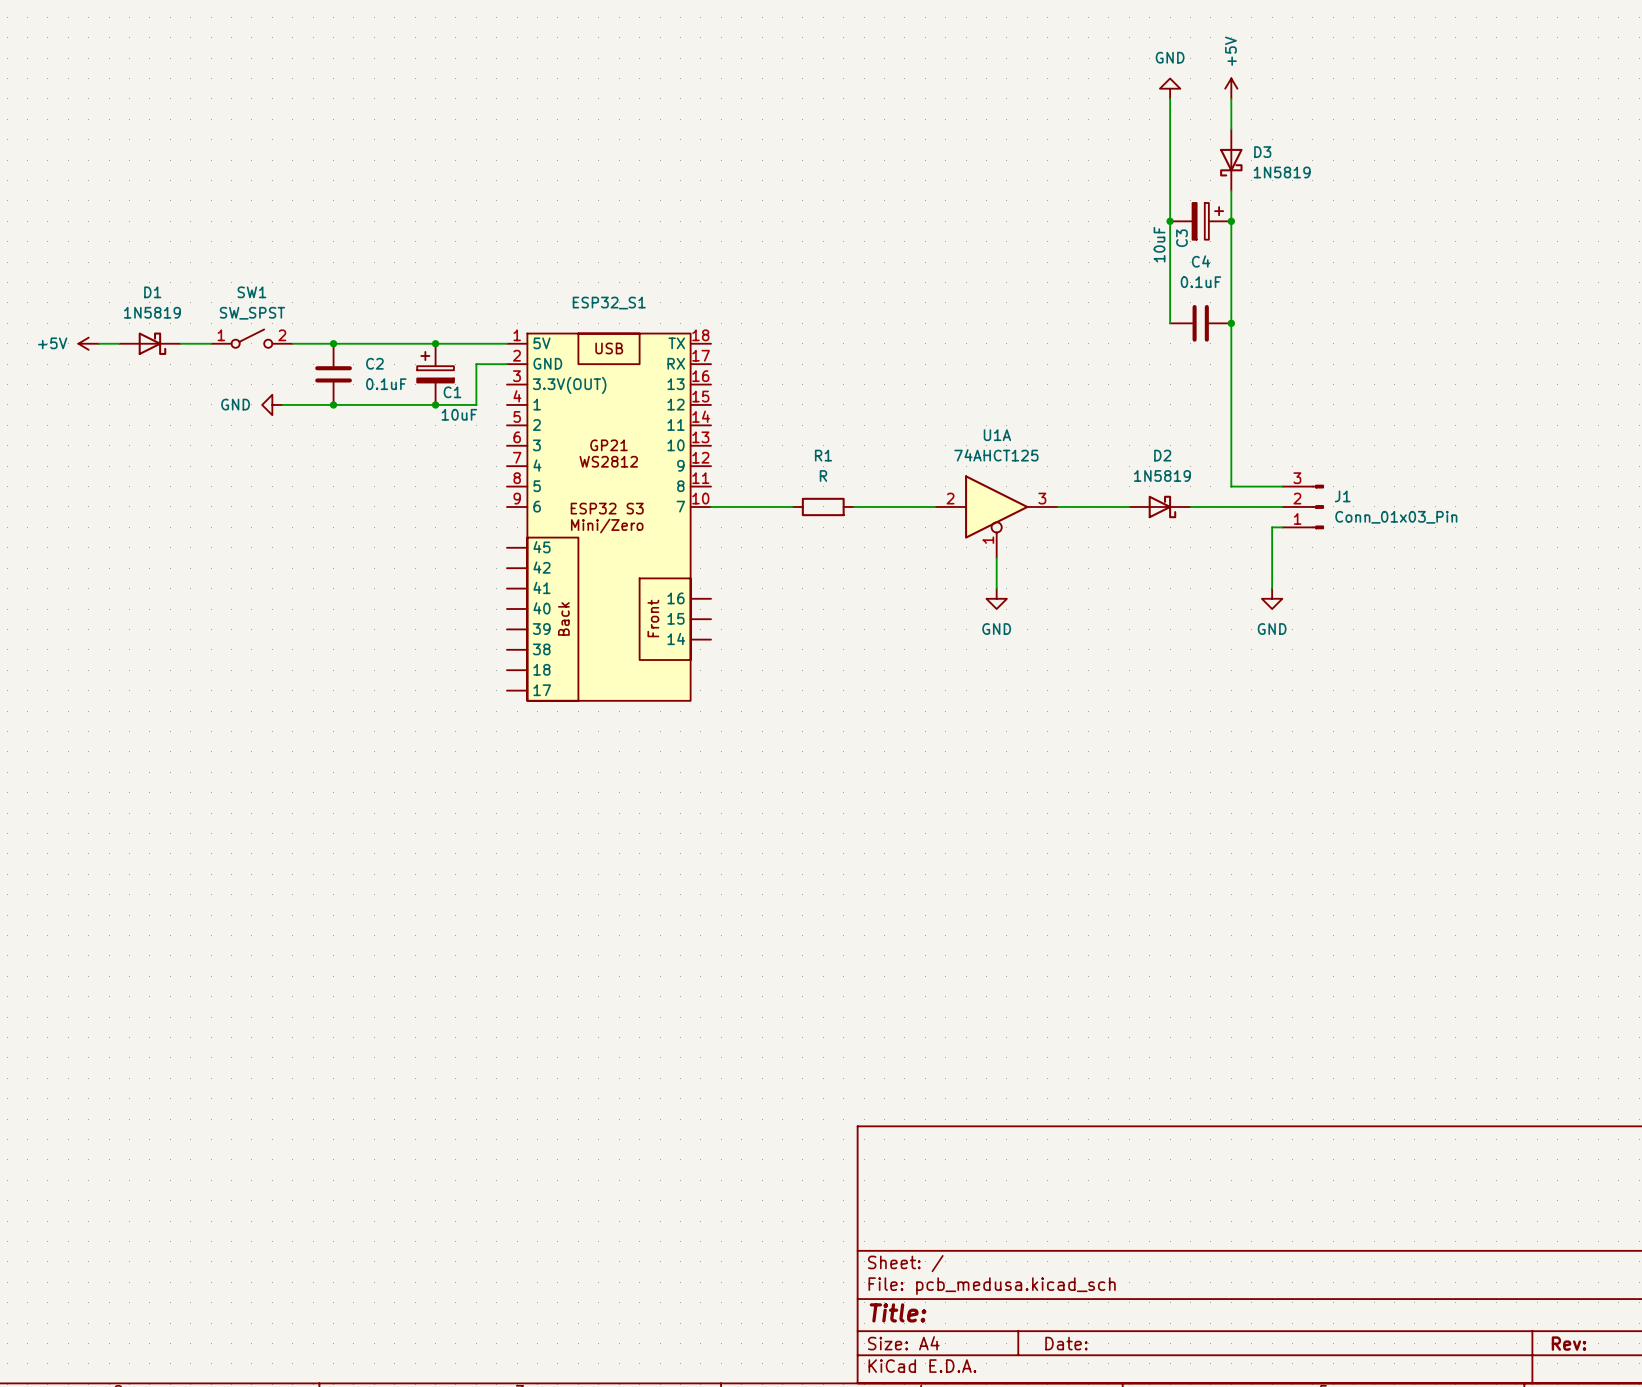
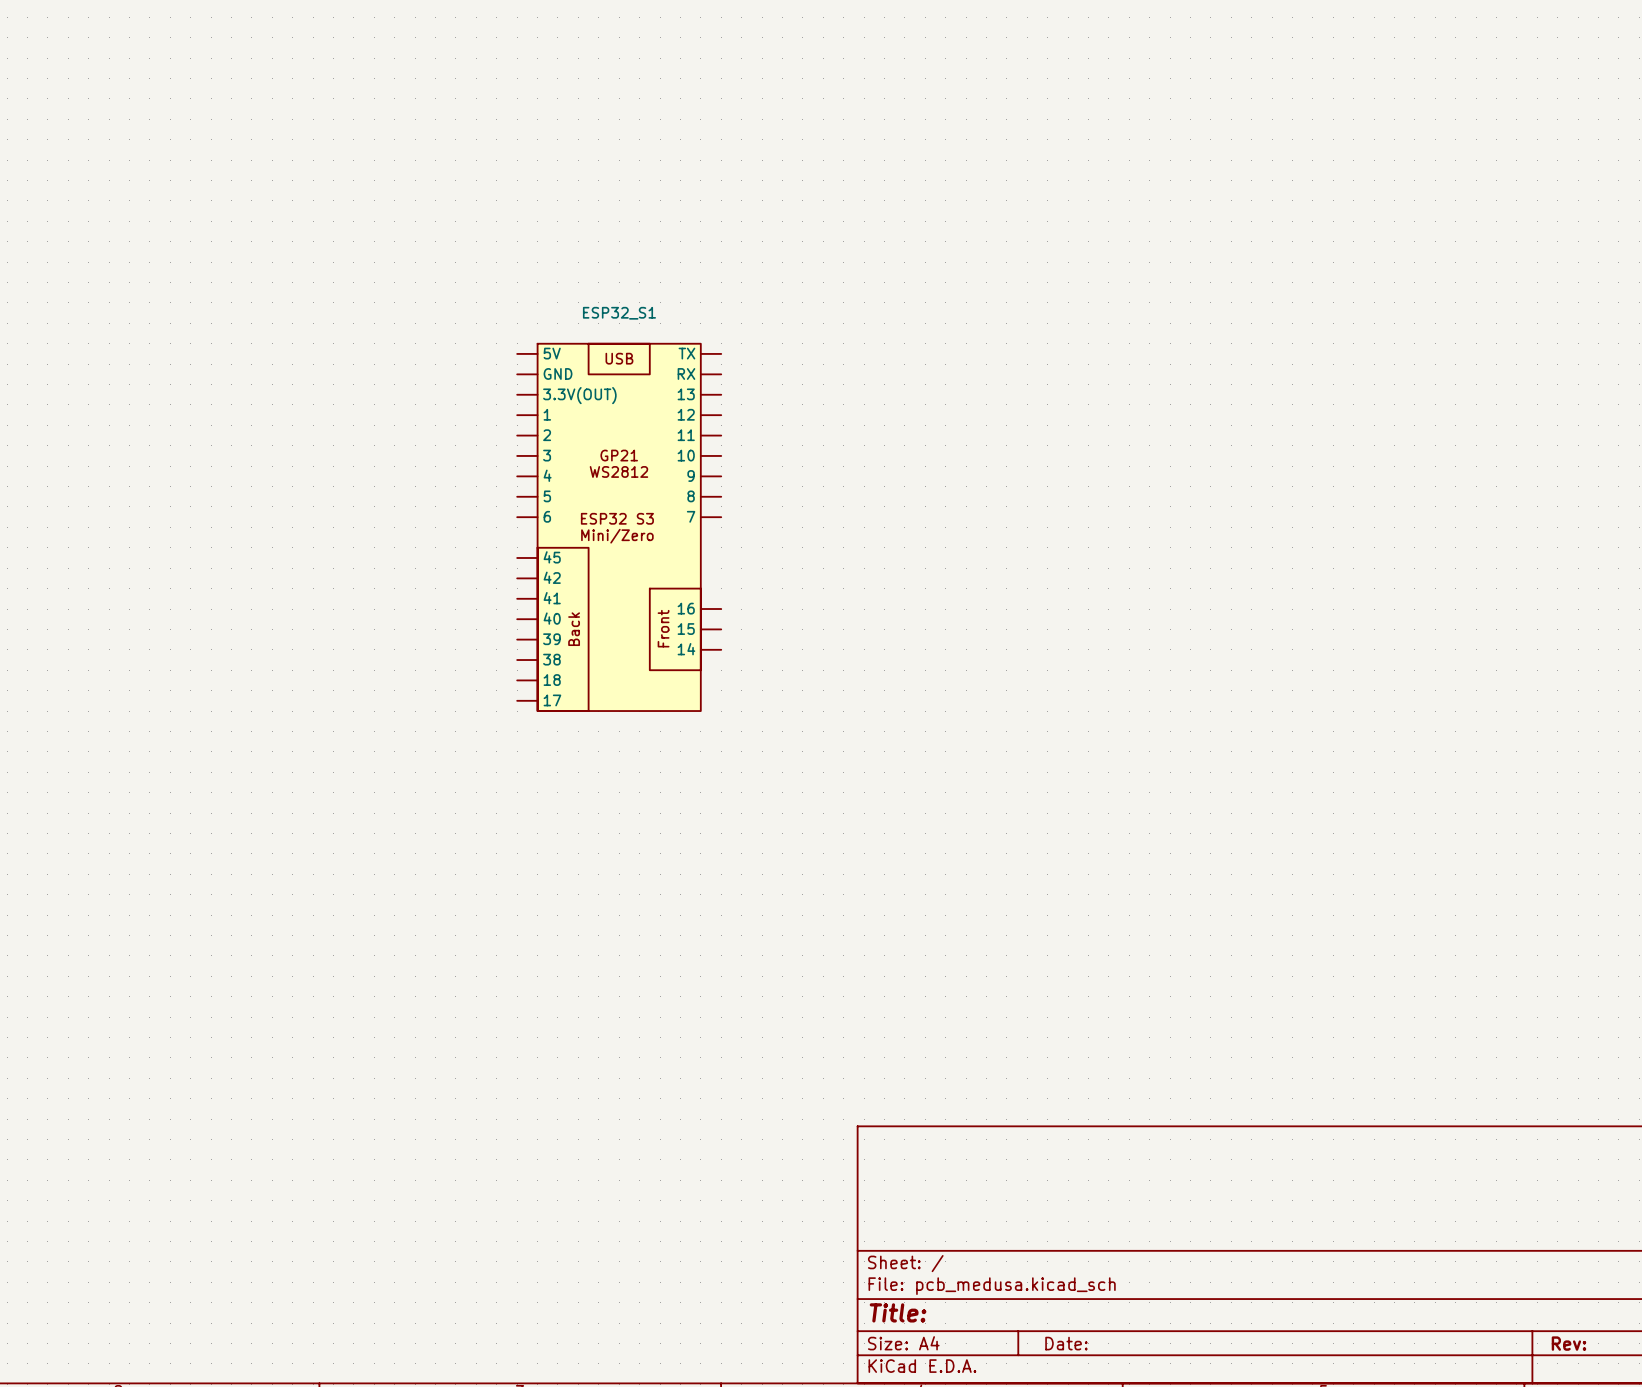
power symbol: GND (1170, 88) -> none
power symbol: +5V (1231, 88) -> none
wire: (1170, 98) (1170, 323) -> none
wire: (1231, 98) (1231, 129) -> none
D3: 1N5819 (1231, 160) -> none
wire: (1231, 190) (1231, 486) (1282, 486) -> none
junction: (1170, 221) -> none
C3: 10uF (1200, 221) -> none
junction: (1231, 221) -> none
C4: 0.1uF (1200, 323) -> none
junction: (1231, 323) -> none
ESP32_S1 symbol: [506, 333, 712, 701] -> [517, 343, 722, 712]
SW1: SW_SPST (251, 338) -> none
power symbol: +5V (88, 343) -> none
wire: (98, 343) (119, 343) -> none
D1: 1N5819 (149, 343) -> none
wire: (180, 343) (211, 343) -> none
wire: (292, 343) (506, 343) -> none
junction: (333, 343) -> none
junction: (435, 343) -> none
wire: (506, 364) (476, 364) (476, 404) (282, 404) -> none
C2: 0.1uF (333, 374) -> none
C1: 10uF (435, 374) -> none
power symbol: GND (272, 404) -> none
junction: (333, 404) -> none
junction: (435, 404) -> none
wire: (711, 506) (792, 506) -> none
R1: R (823, 506) -> none
wire: (853, 506) (935, 506) -> none
wire: (1057, 506) (1129, 506) -> none
D2: 1N5819 (1159, 506) -> none
wire: (1190, 506) (1282, 506) -> none
J1: Conn_01x03_Pin (1303, 506) -> none
U1A: 74AHCT125 (996, 516) -> none
wire: (1282, 527) (1272, 527) (1272, 588) -> none
wire: (996, 557) (996, 588) -> none
power symbol: GND (996, 598) -> none
power symbol: GND (1272, 598) -> none

